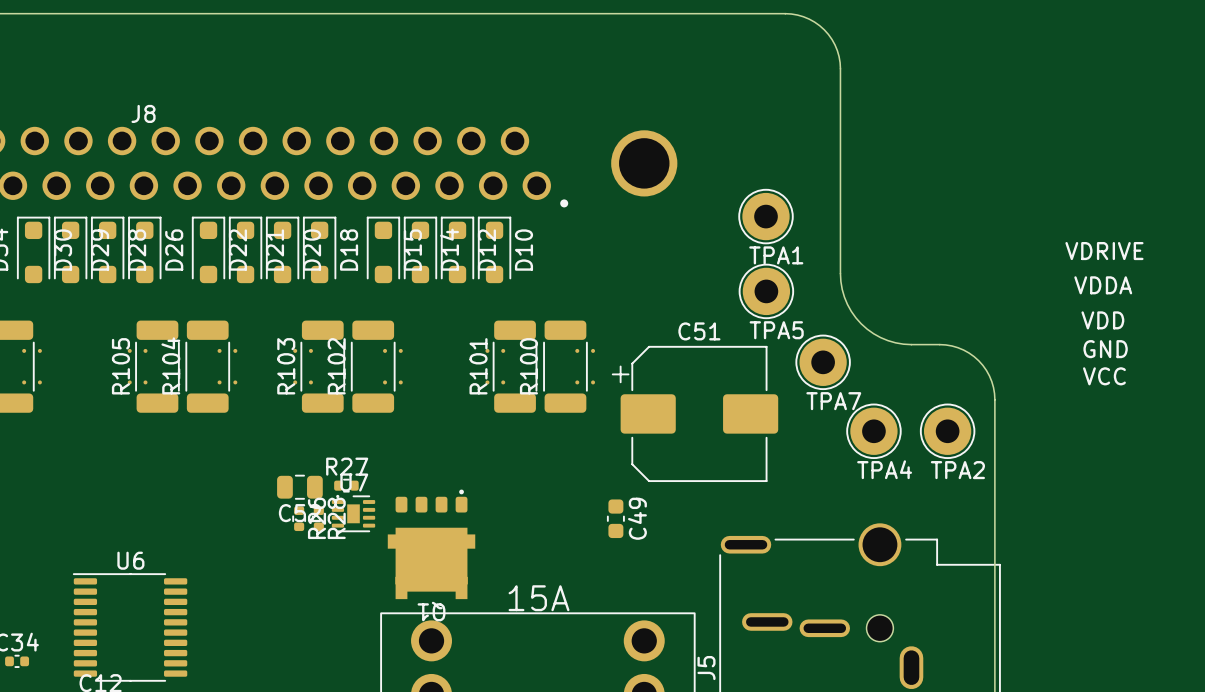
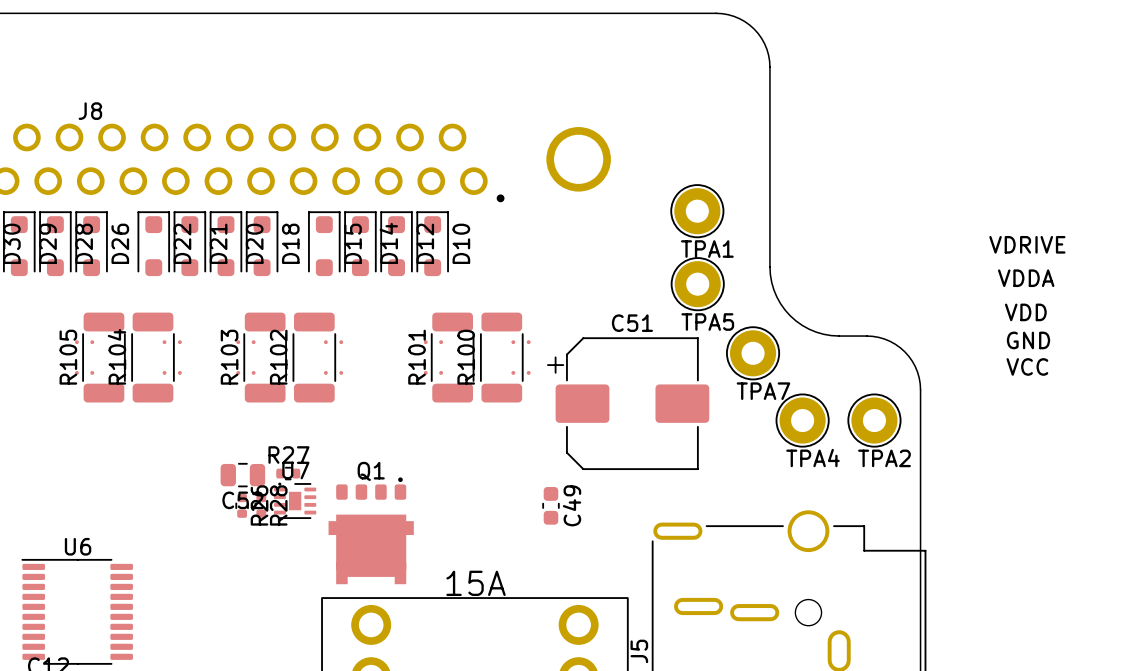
Q1 name rotation: 0° (431, 611) -> 180° (371, 471)
Q1 name position: Q1 (431, 611) -> Q1 (371, 471)

